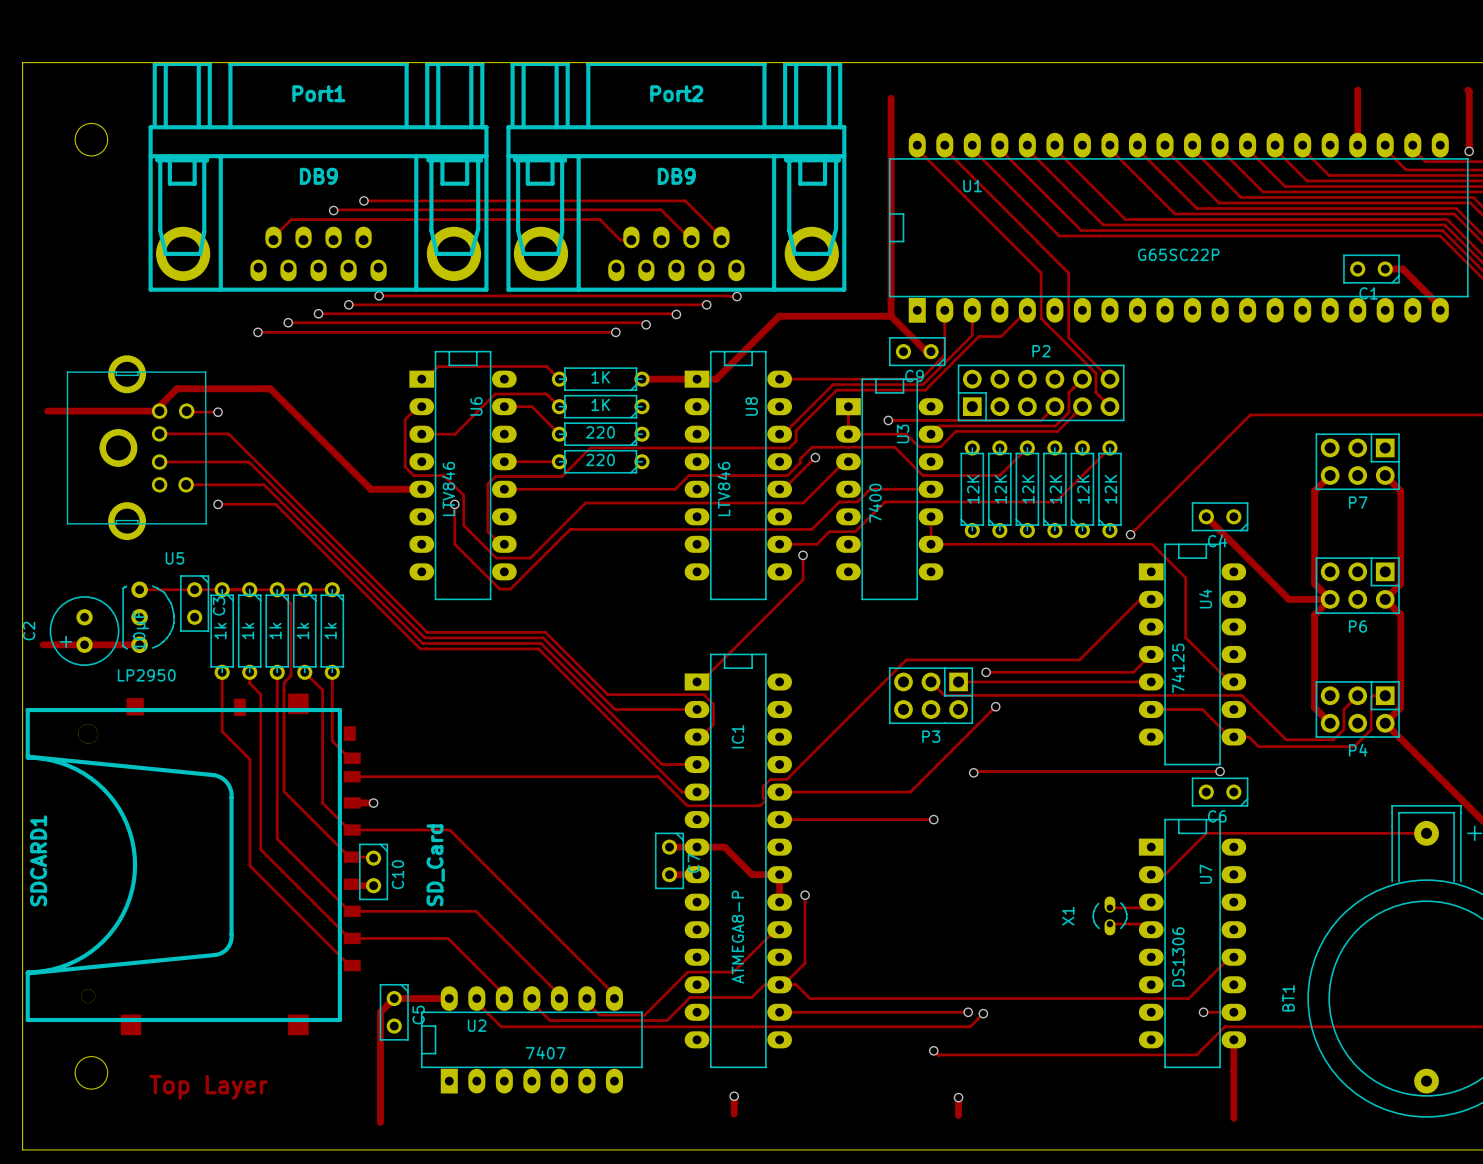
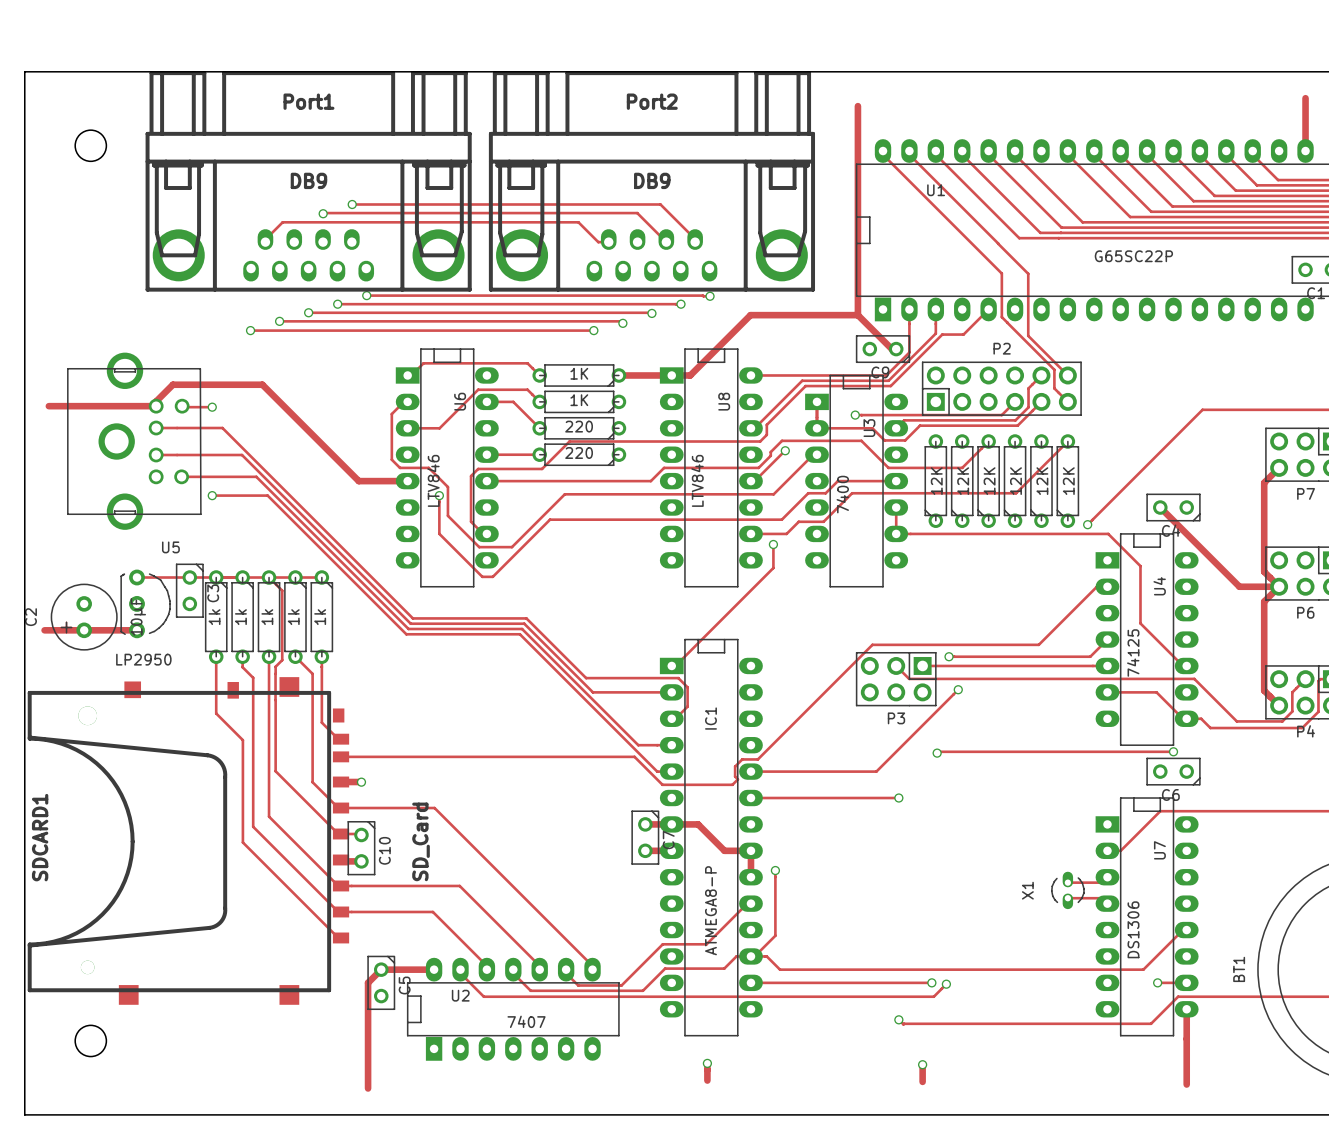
text: Top Layer (208, 1087) -> none

